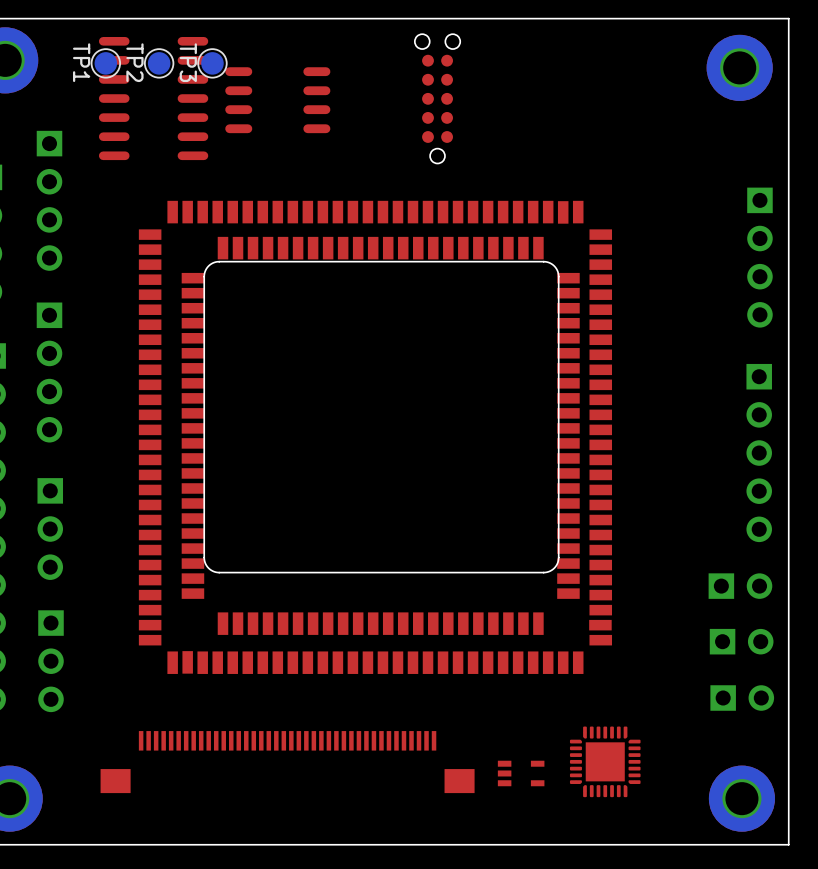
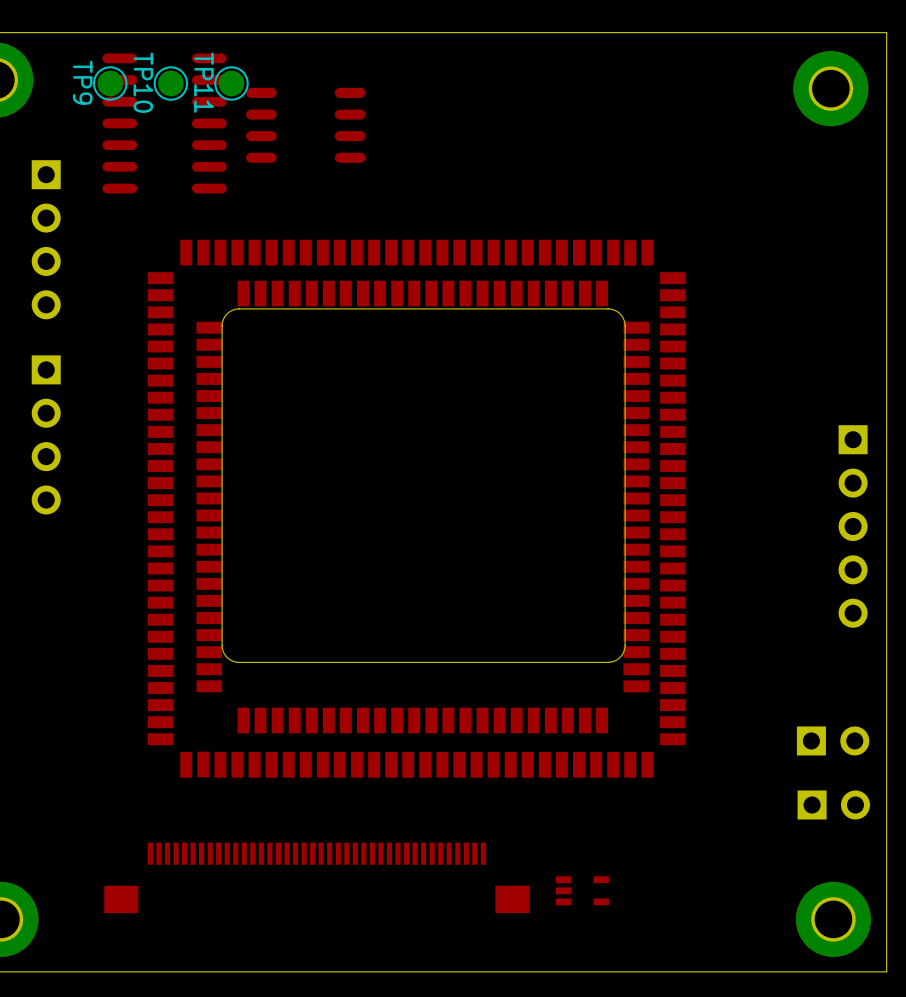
TP1 name: TP1 (81, 62) -> TP9 (82, 82)
TP2 name: TP2 (134, 62) -> TP10 (143, 82)
TP3 name: TP3 (188, 62) -> TP11 (203, 82)
part: (437, 98) -> none
part: (759, 257) -> none
part: (50, 529) -> none
part: (740, 586) -> none
part: (51, 661) -> none
part: (605, 761) -> none

